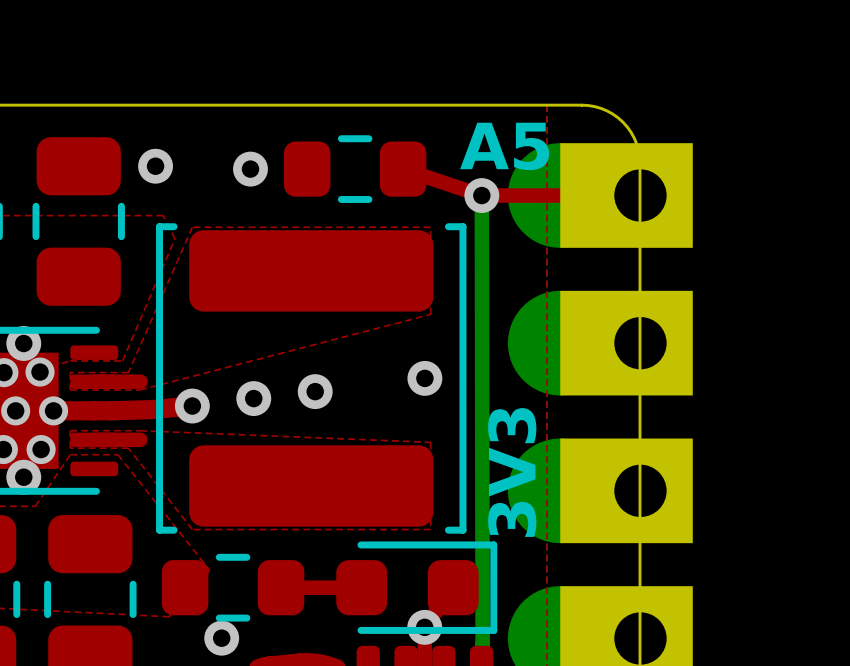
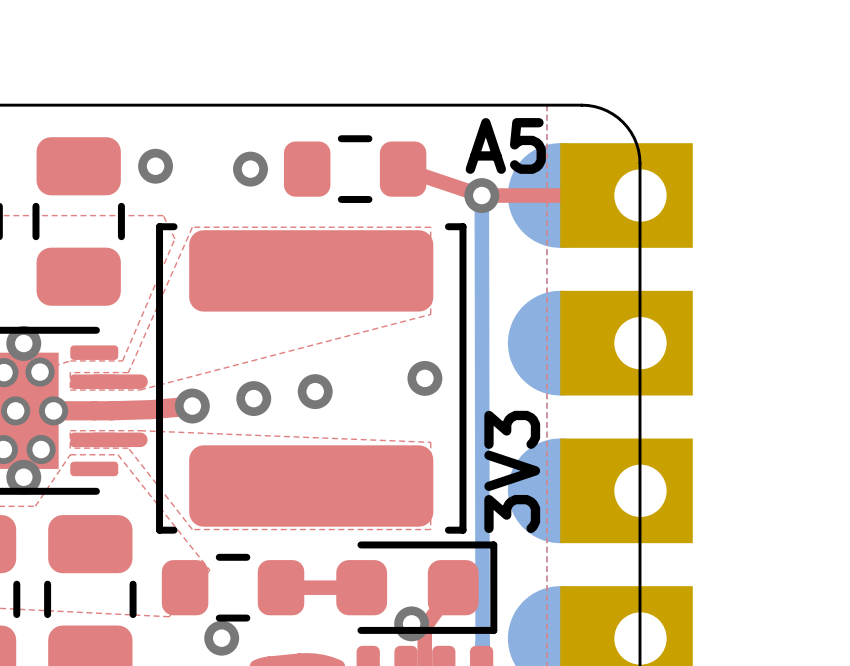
via position: (424, 627) -> (411, 623)

